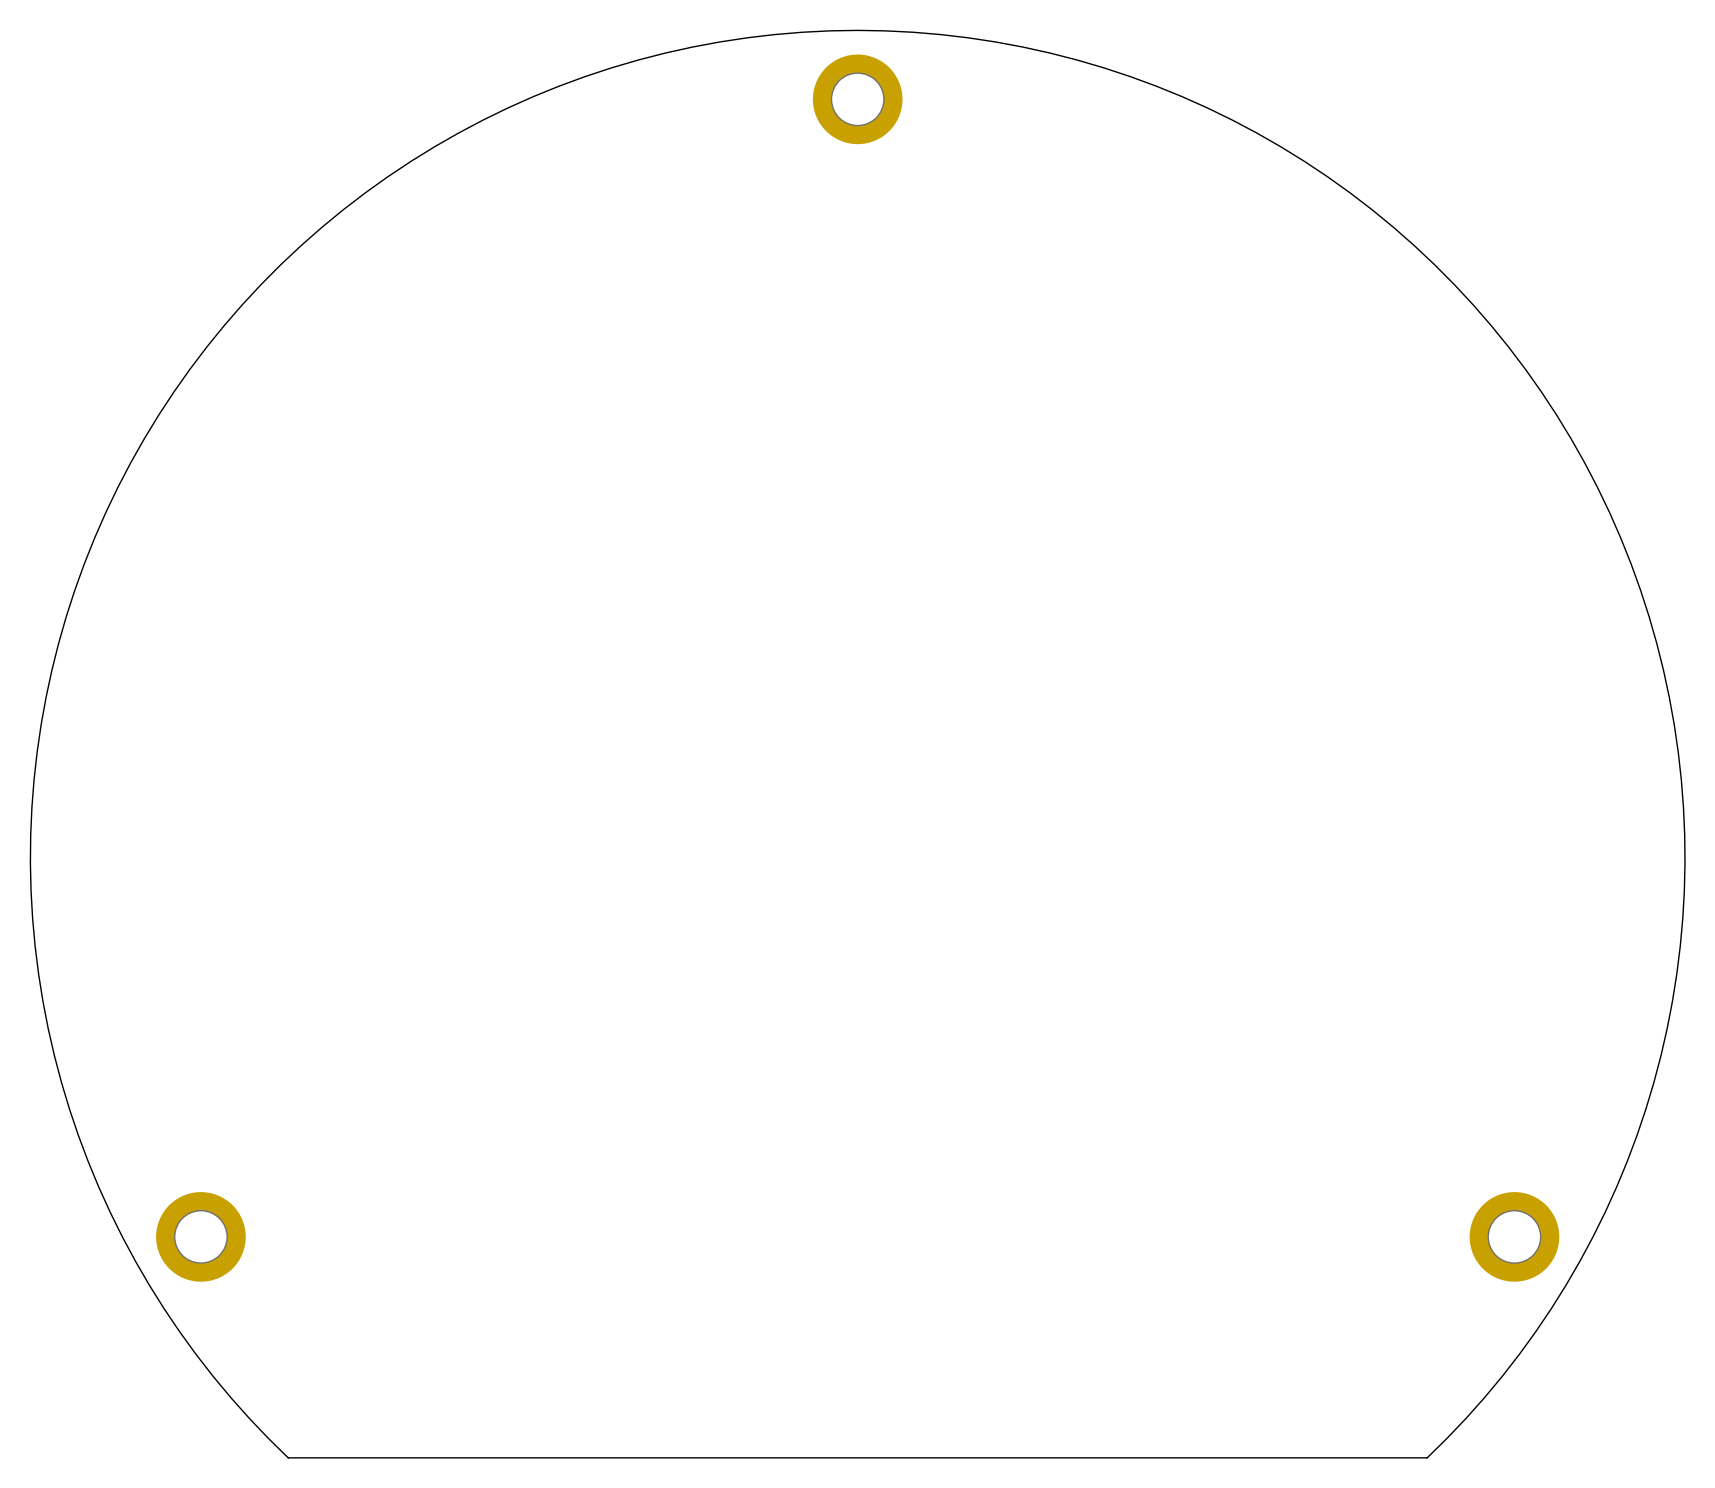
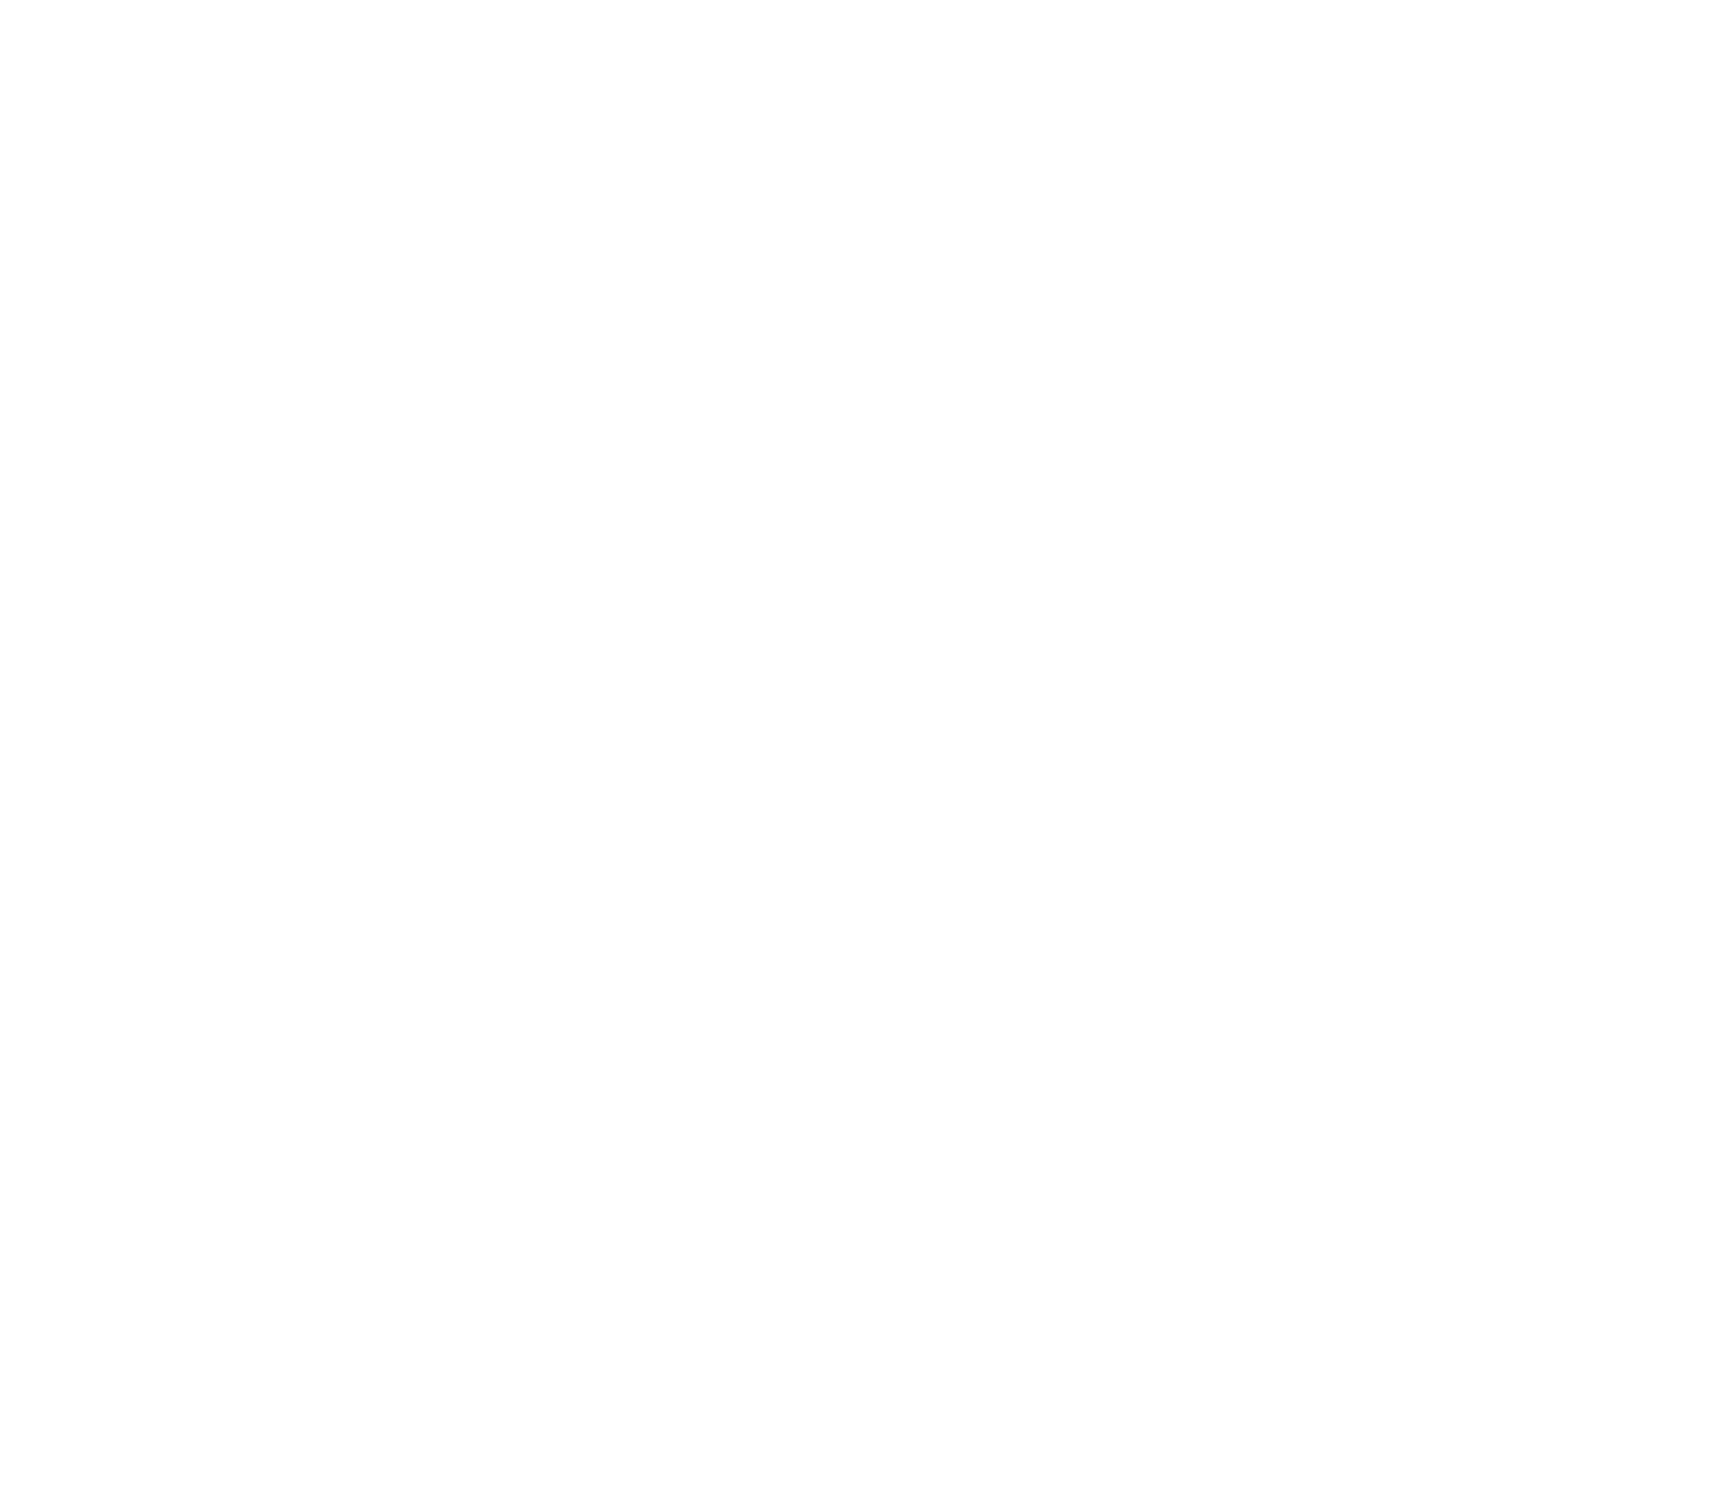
part: (857, 99) -> none
part: (200, 1236) -> none
part: (1514, 1236) -> none
board edge: (288, 1457) (1427, 1457) (1446, 1438) (1502, 1376) (1551, 1308) (1593, 1236) (1627, 1161) (1653, 1082) (1667, 1028) (1680, 946) (1685, 862) (1681, 779) (1669, 697) (1649, 616) (1620, 538) (1584, 463) (1541, 392) (1491, 325) (1434, 264) (1372, 209) (1304, 161) (1232, 120) (1156, 86) (1077, 60) (995, 42) (913, 32) (829, 30) (746, 37) (665, 53) (585, 76) (508, 107) (434, 146) (365, 192) (321, 227) (261, 284) (206, 347) (158, 415) (117, 487) (94, 538) (66, 616) (46, 697) (34, 779) (30, 862) (35, 946) (48, 1028) (69, 1108) (98, 1186) (135, 1261) (179, 1331) (230, 1397) (288, 1457) -> none

